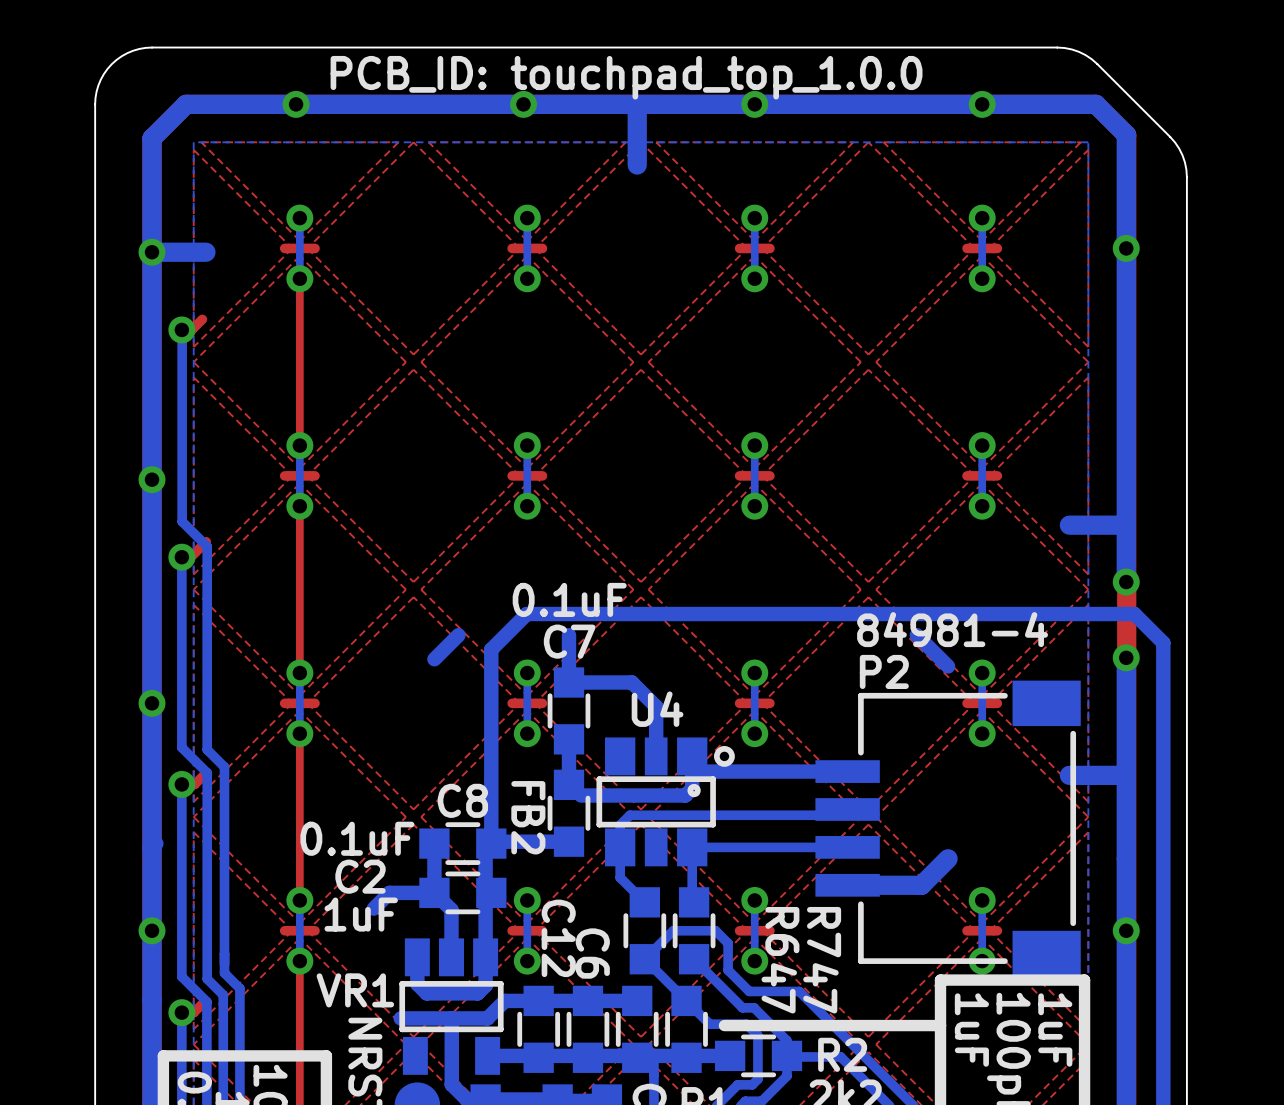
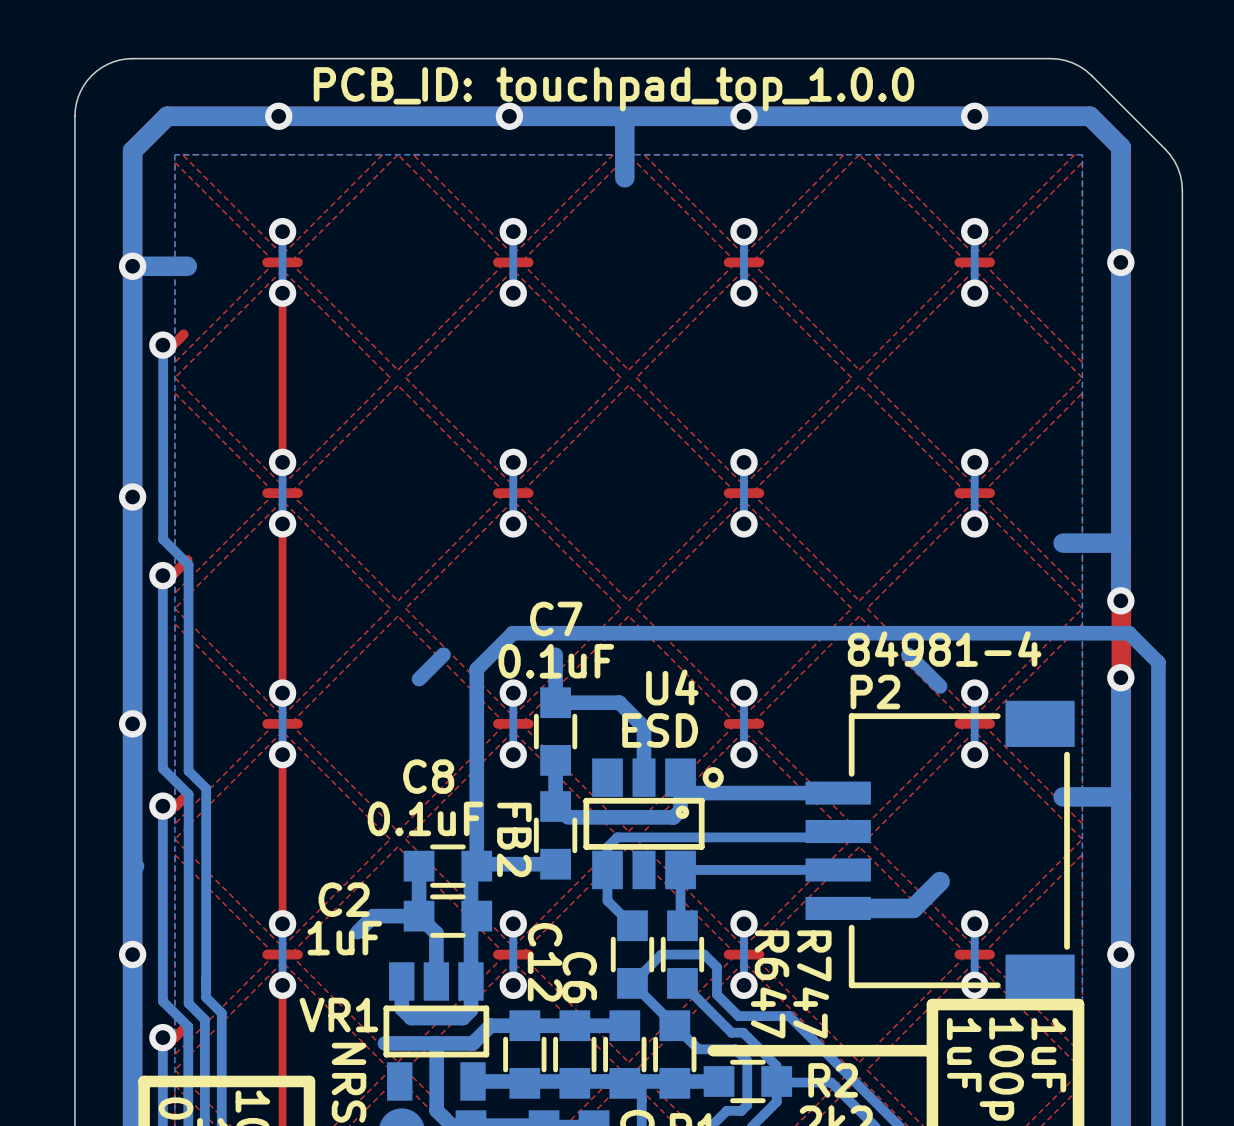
C7 value position: 0.1uF (569, 599) -> 0.1uF (556, 661)
C7 name position: C7 (569, 641) -> C7 (556, 618)
U4 name position: U4 (657, 709) -> U4 (672, 687)
U4 value: none -> ESD (660, 730)
C8 name position: C8 (462, 800) -> C8 (428, 776)
C8 value position: 0.1uF (357, 838) -> 0.1uF (425, 818)

